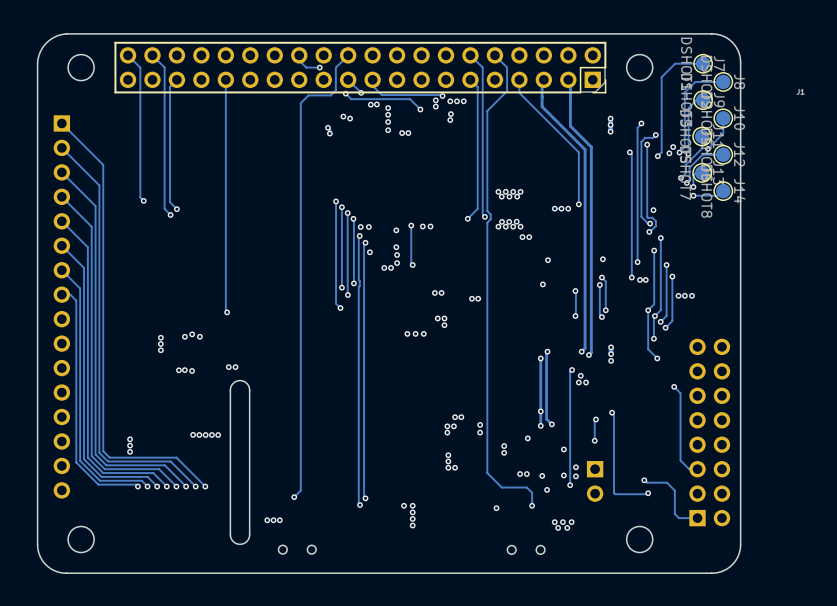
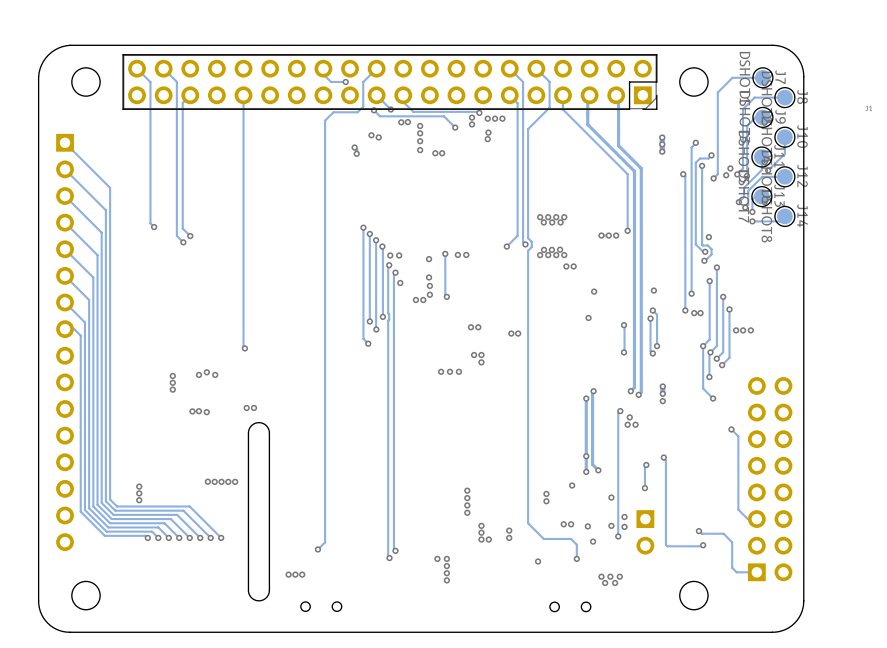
via: (455, 417) -> none
via: (461, 417) -> none
via: (480, 424) -> none
via: (447, 426) -> none
via: (453, 426) -> none
via: (447, 432) -> none
via: (480, 432) -> none
via: none -> (467, 490)
via: none -> (467, 498)
via: (448, 455) -> none
via: none -> (467, 505)
via: (448, 461) -> none
via: none -> (467, 512)
via: (448, 467) -> none
via: (455, 467) -> none
via: none -> (481, 525)
via: none -> (509, 530)
via: none -> (481, 532)
via: none -> (509, 537)
via: none -> (481, 539)
via: none -> (488, 539)

